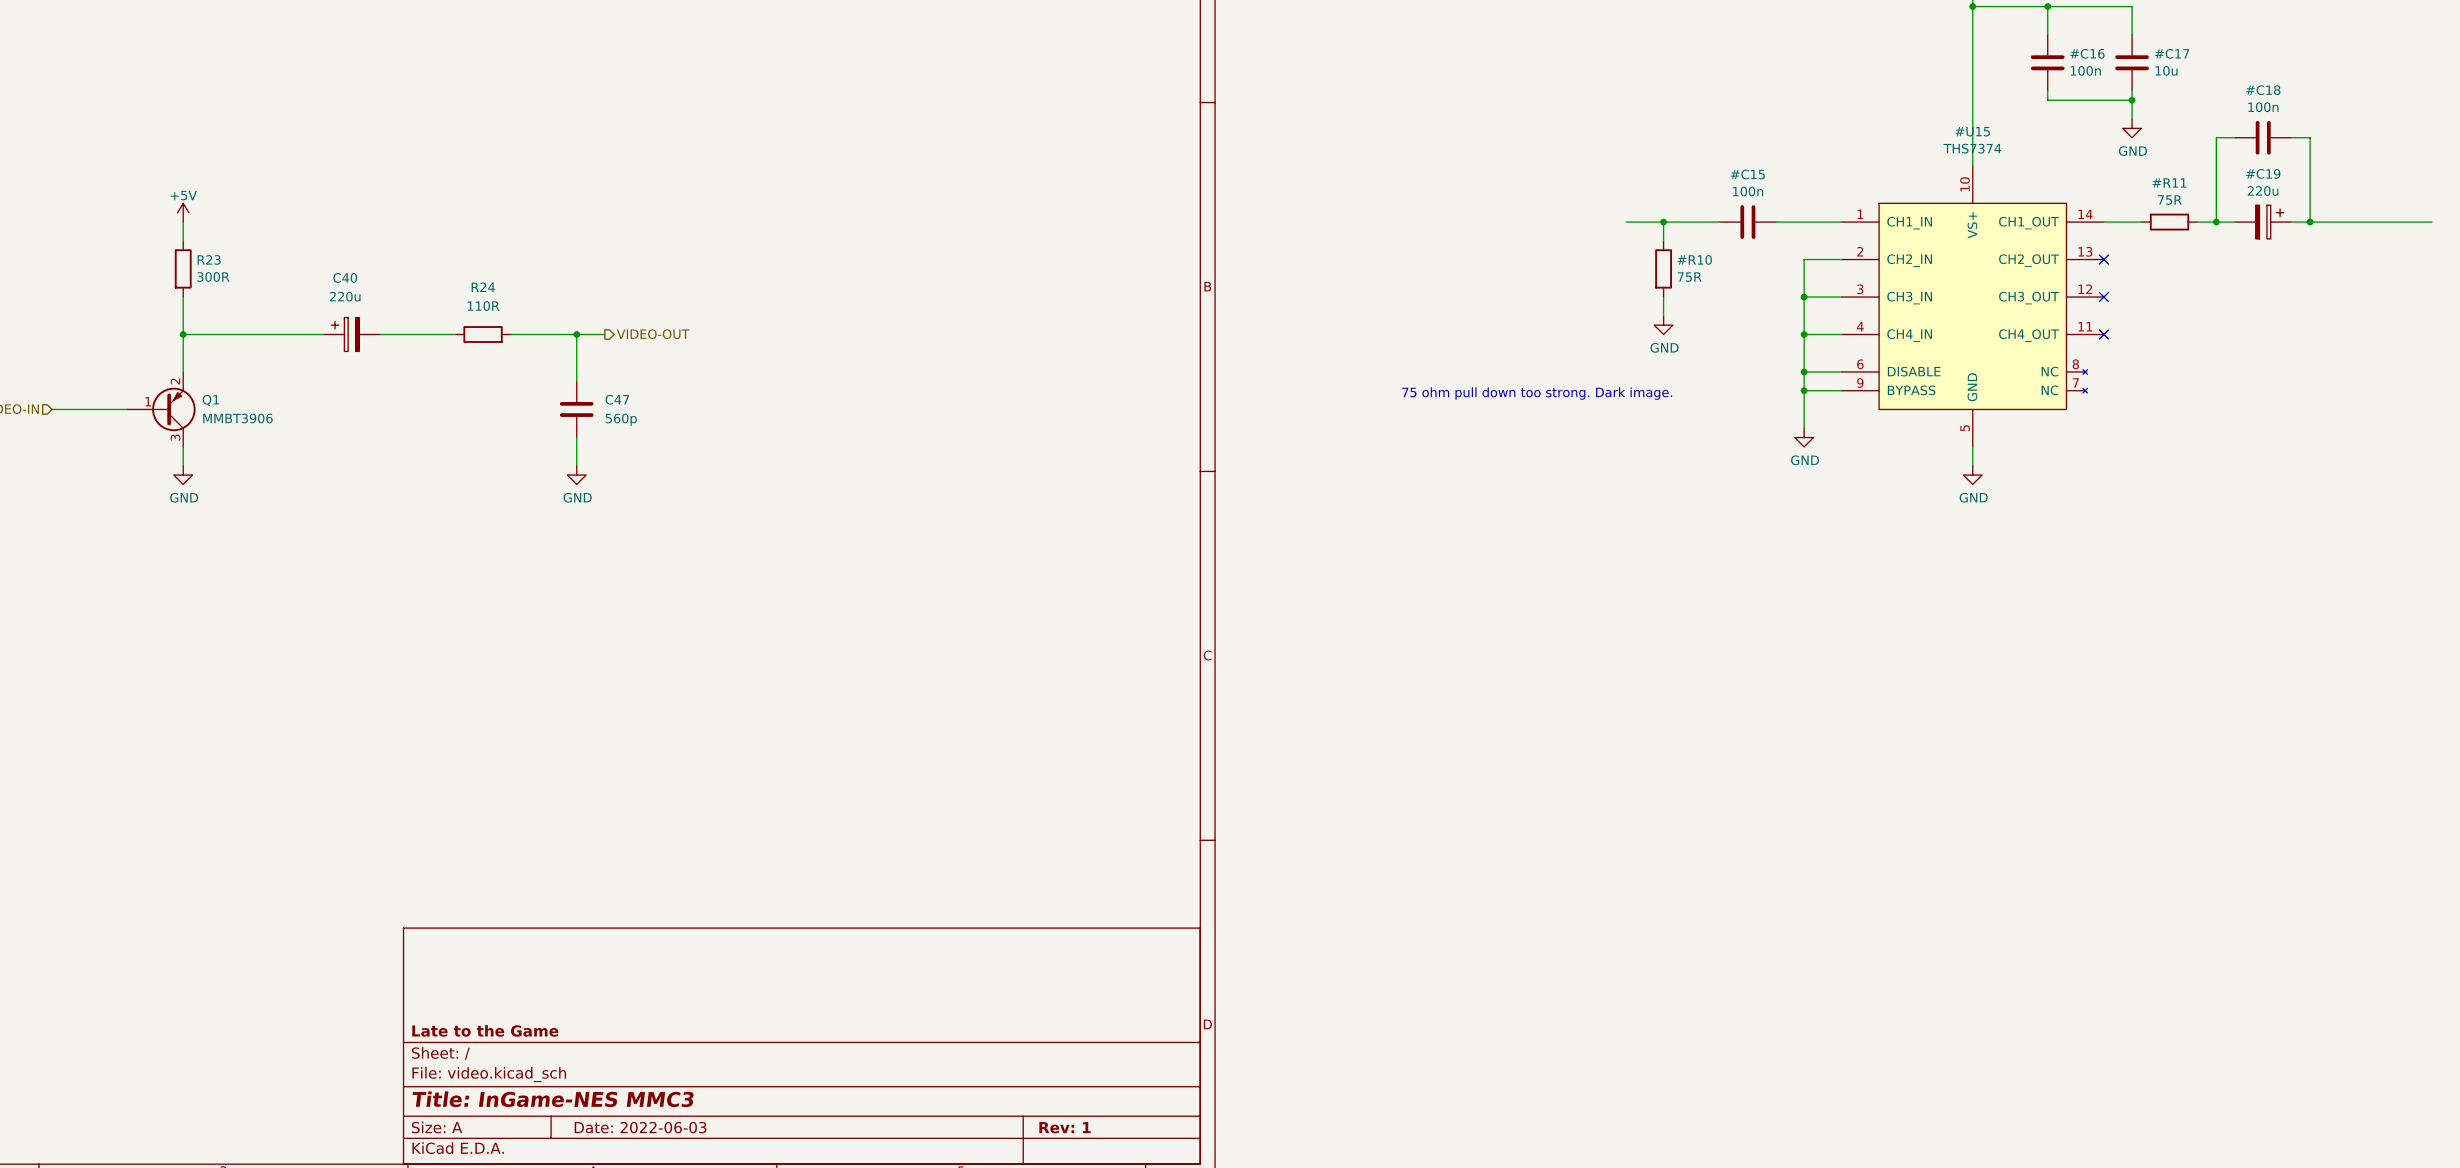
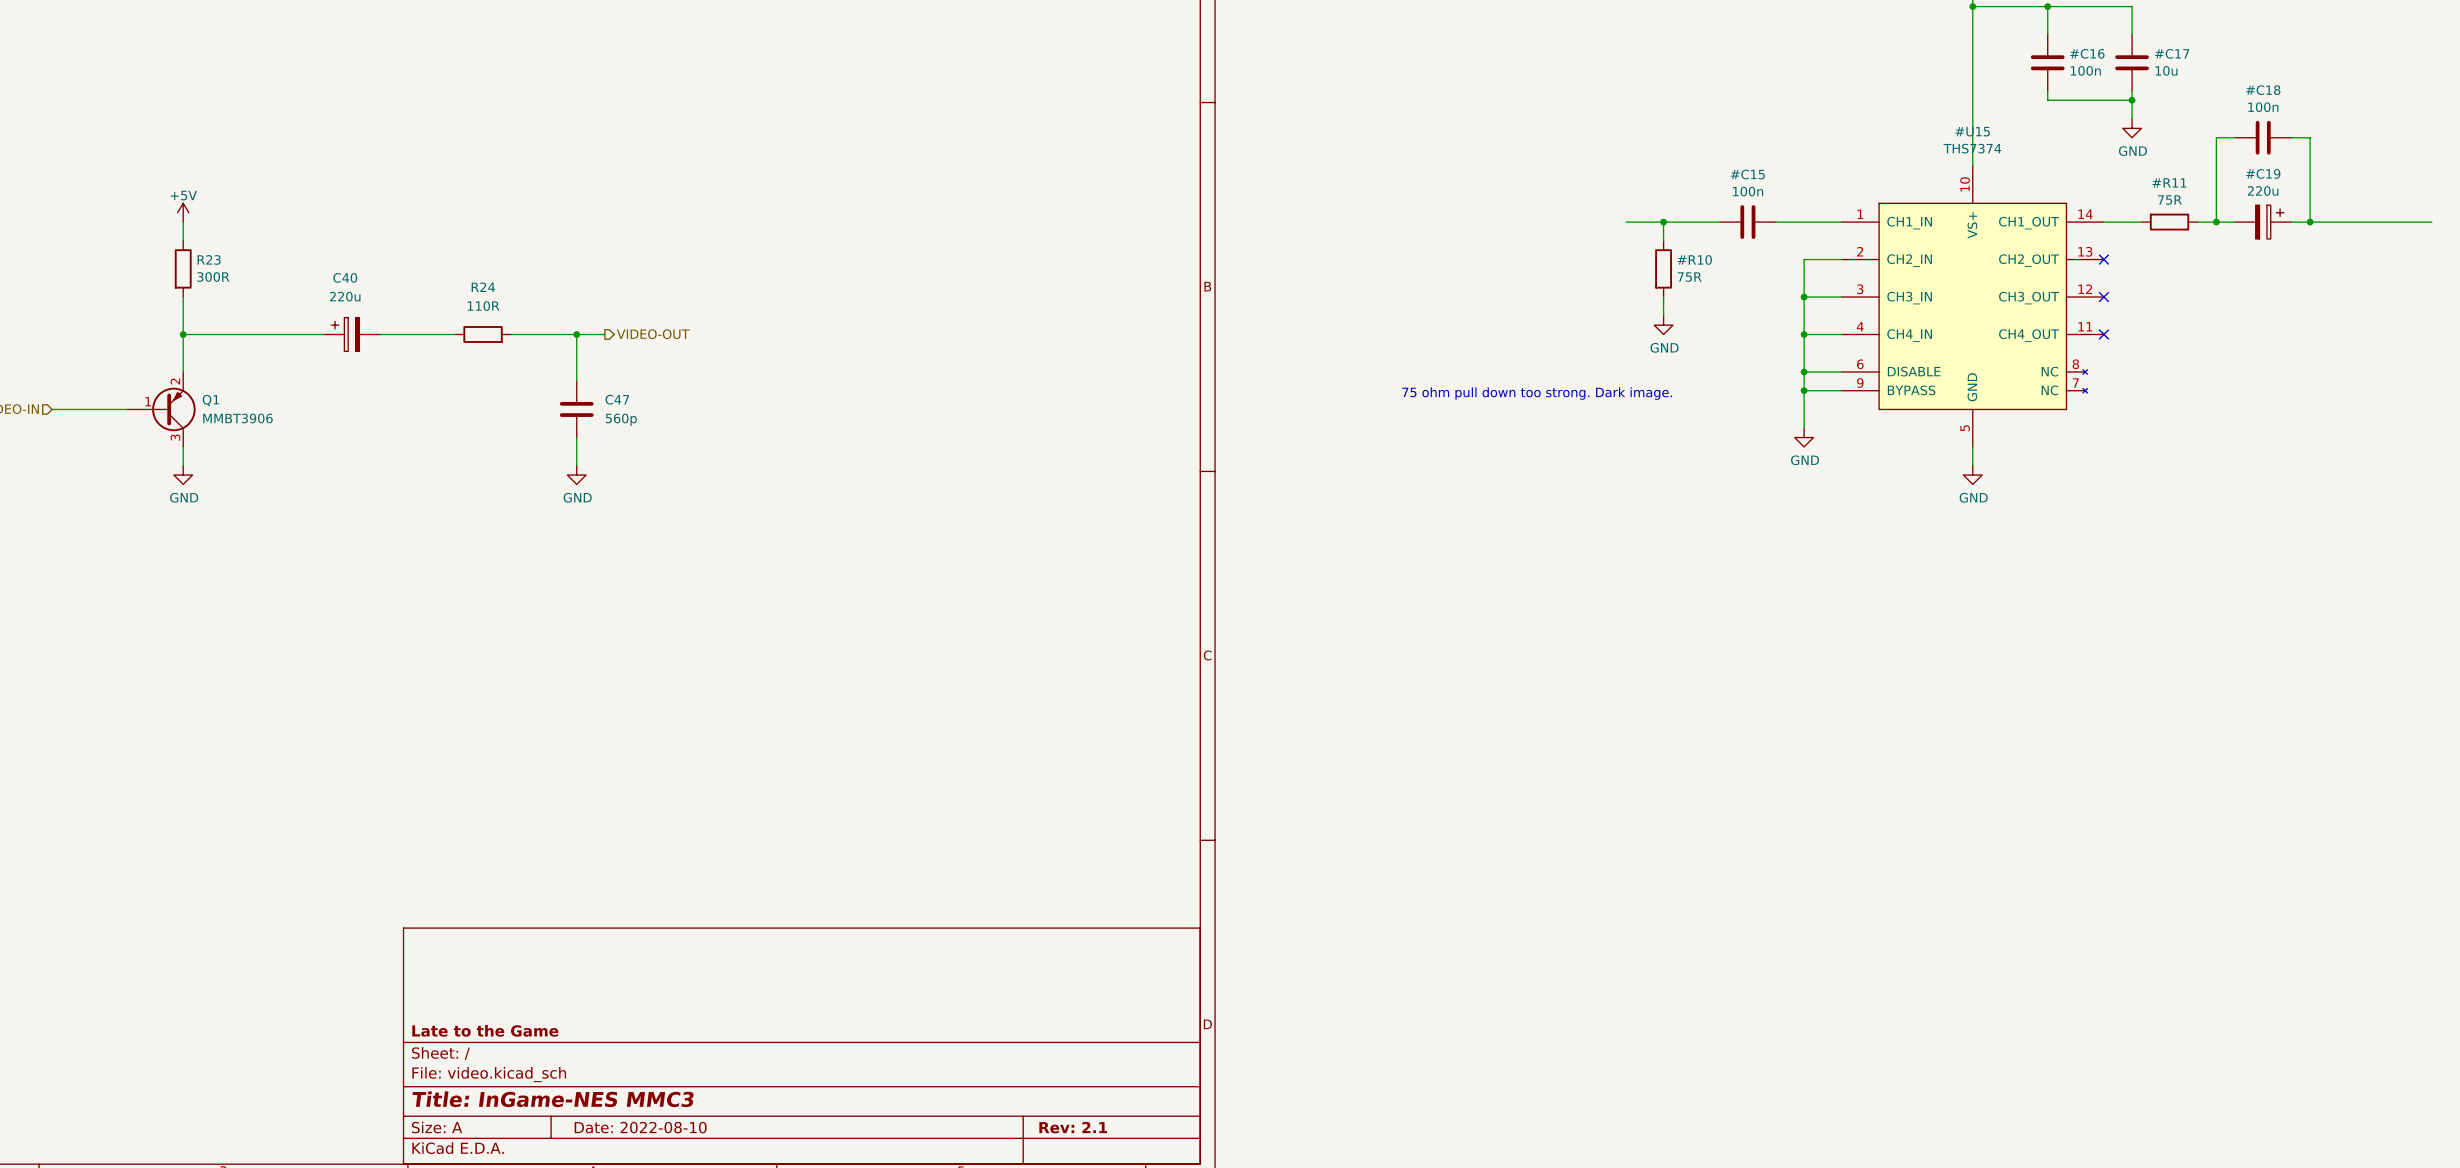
title block: Date: 2022-06-03 (640, 1127) -> Date: 2022-08-10 (640, 1127)
title block: Rev: 1 (1065, 1127) -> Rev: 2.1 (1073, 1127)

